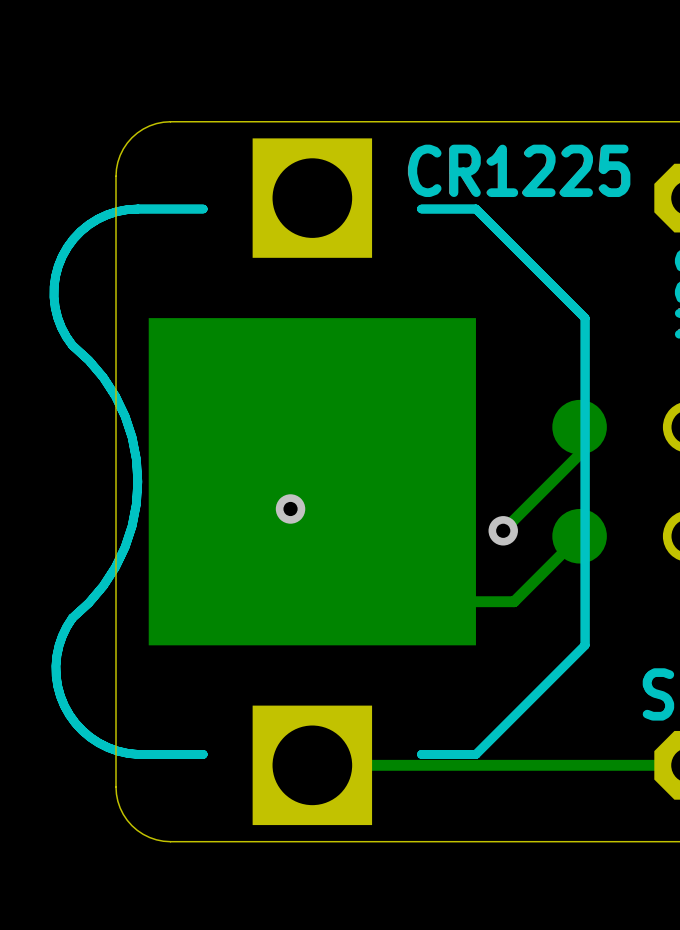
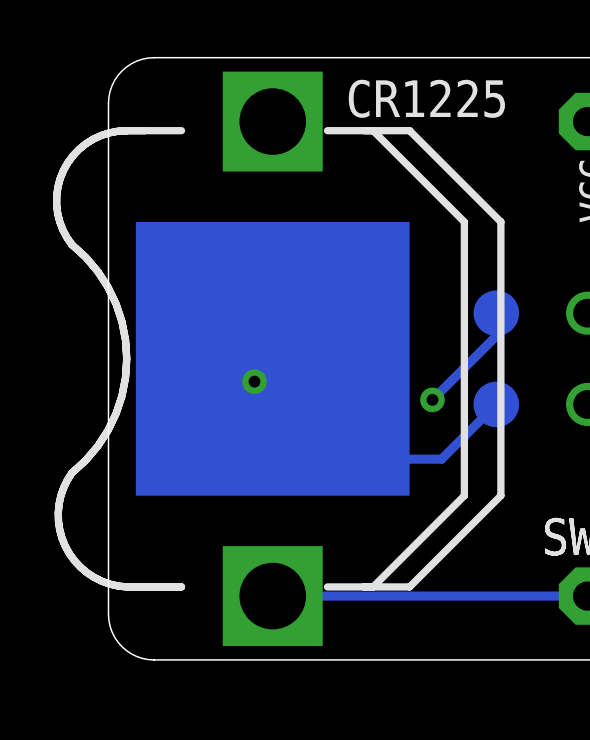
line: (203, 209) (159, 209) -> (364, 130) (327, 130)
line: (432, 209) (475, 209) (585, 318) (585, 645) (475, 754) (432, 754) -> (373, 130) (464, 221) (464, 495) (373, 586)
line: none -> (364, 586) (327, 586)

